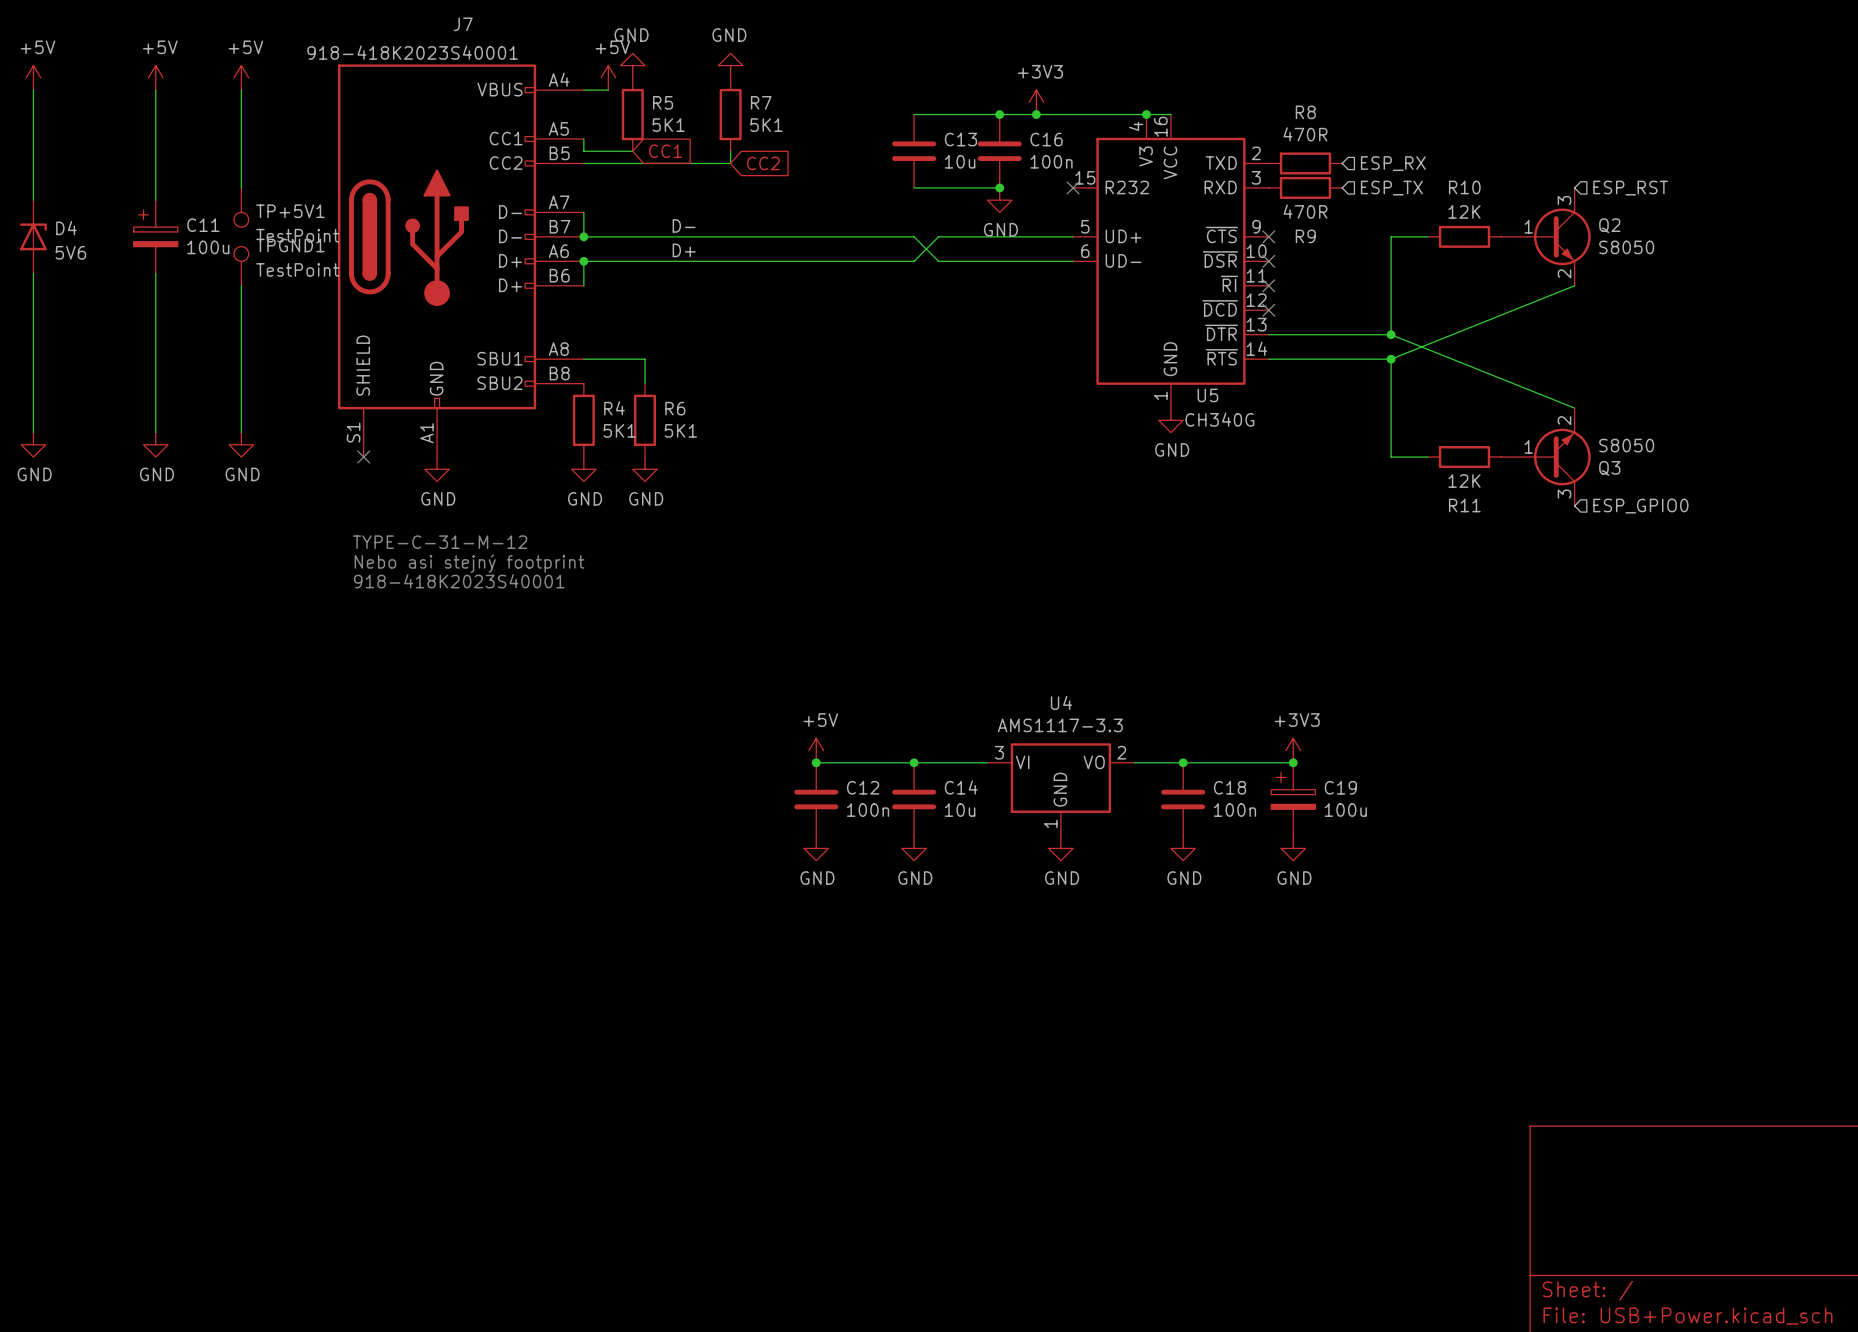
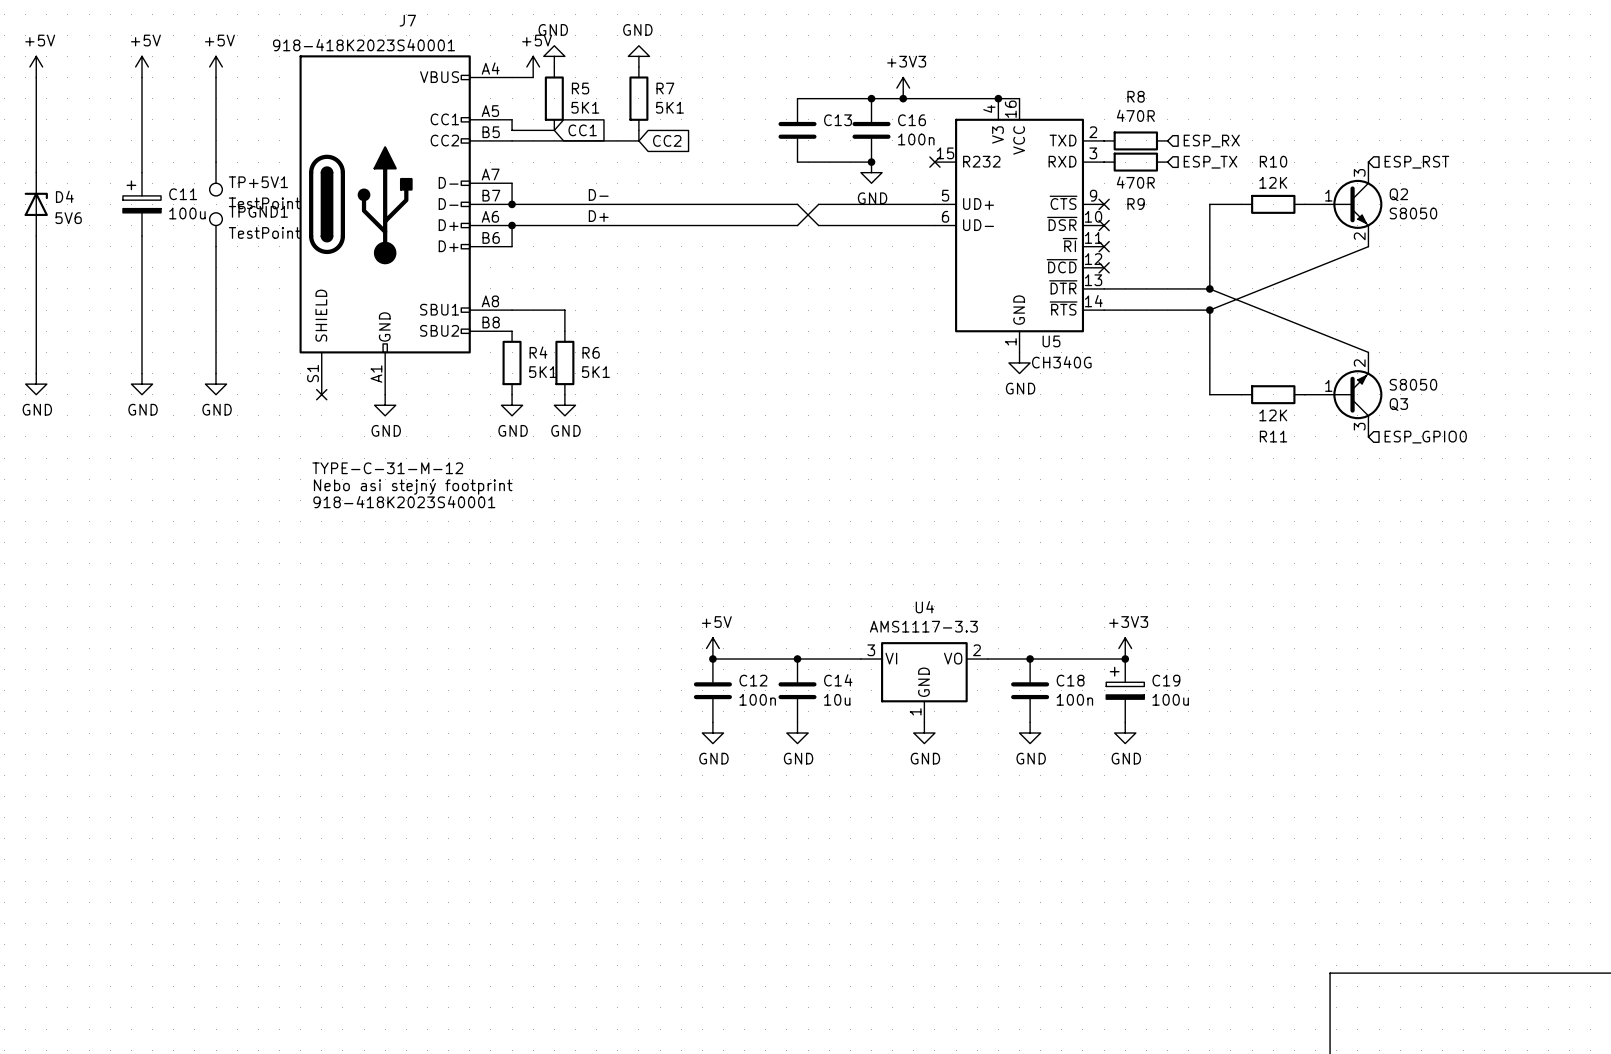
C13 value: 10u (960, 161) -> none

